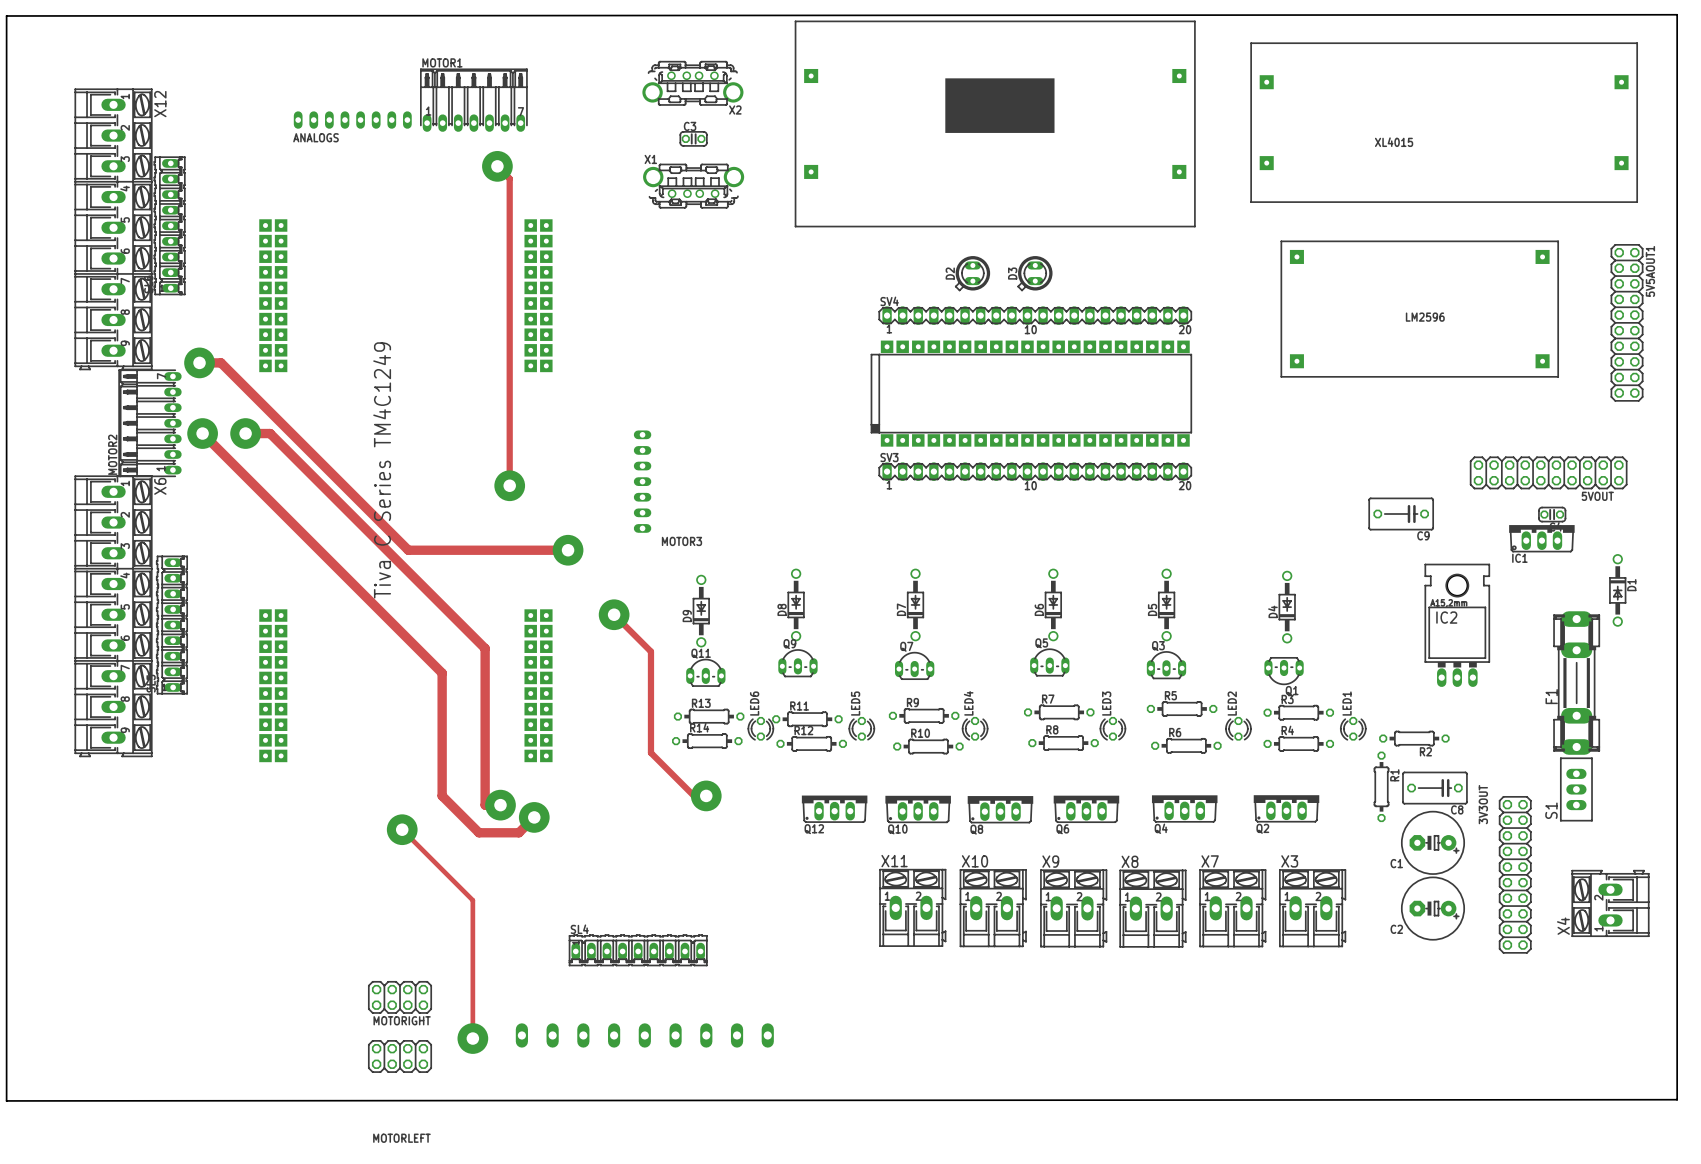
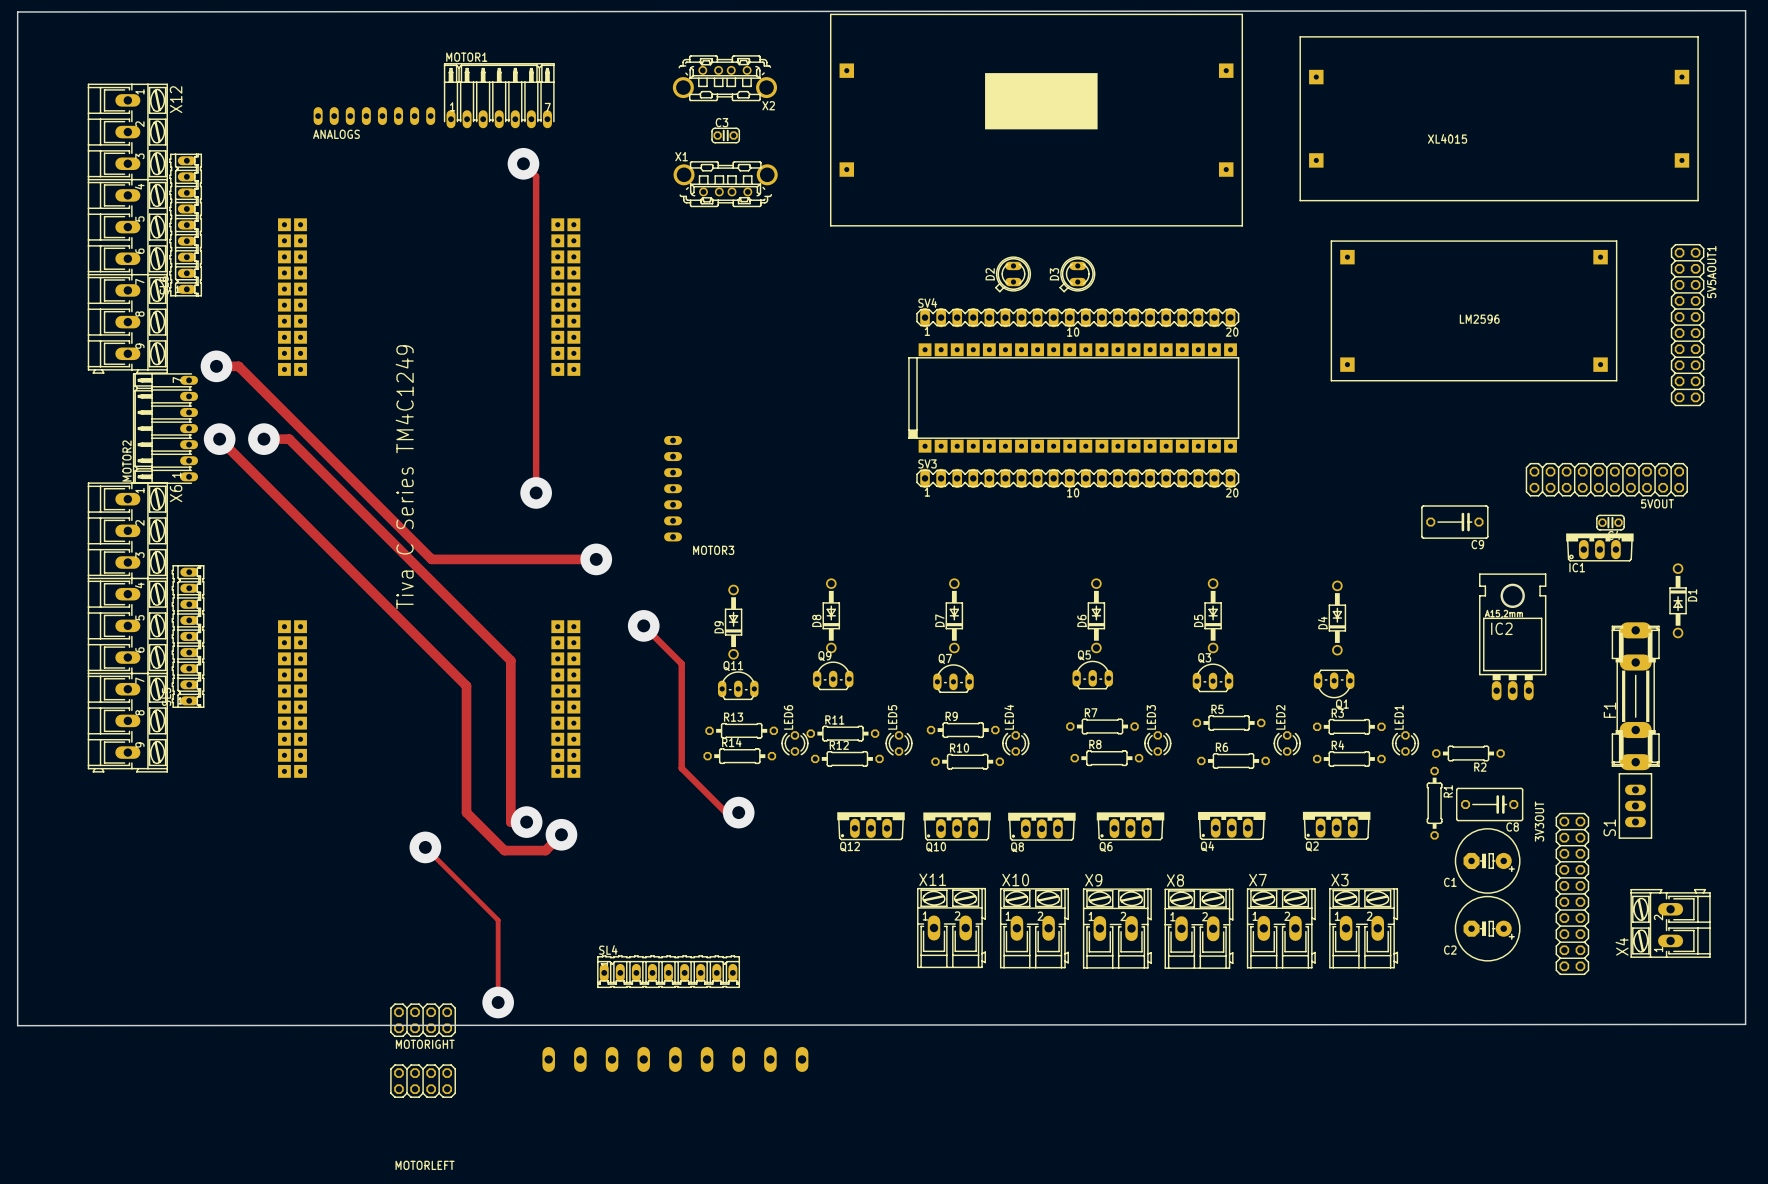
board edge: (6, 19) (6, 15) (1677, 14) (1677, 1099) (6, 1100) (6, 1002) -> (17, 12) (1745, 10) (1745, 1024) (17, 1025)
track: (472, 980) (472, 1038) -> none
via: none -> (498, 1002)
via: (472, 1038) -> none

